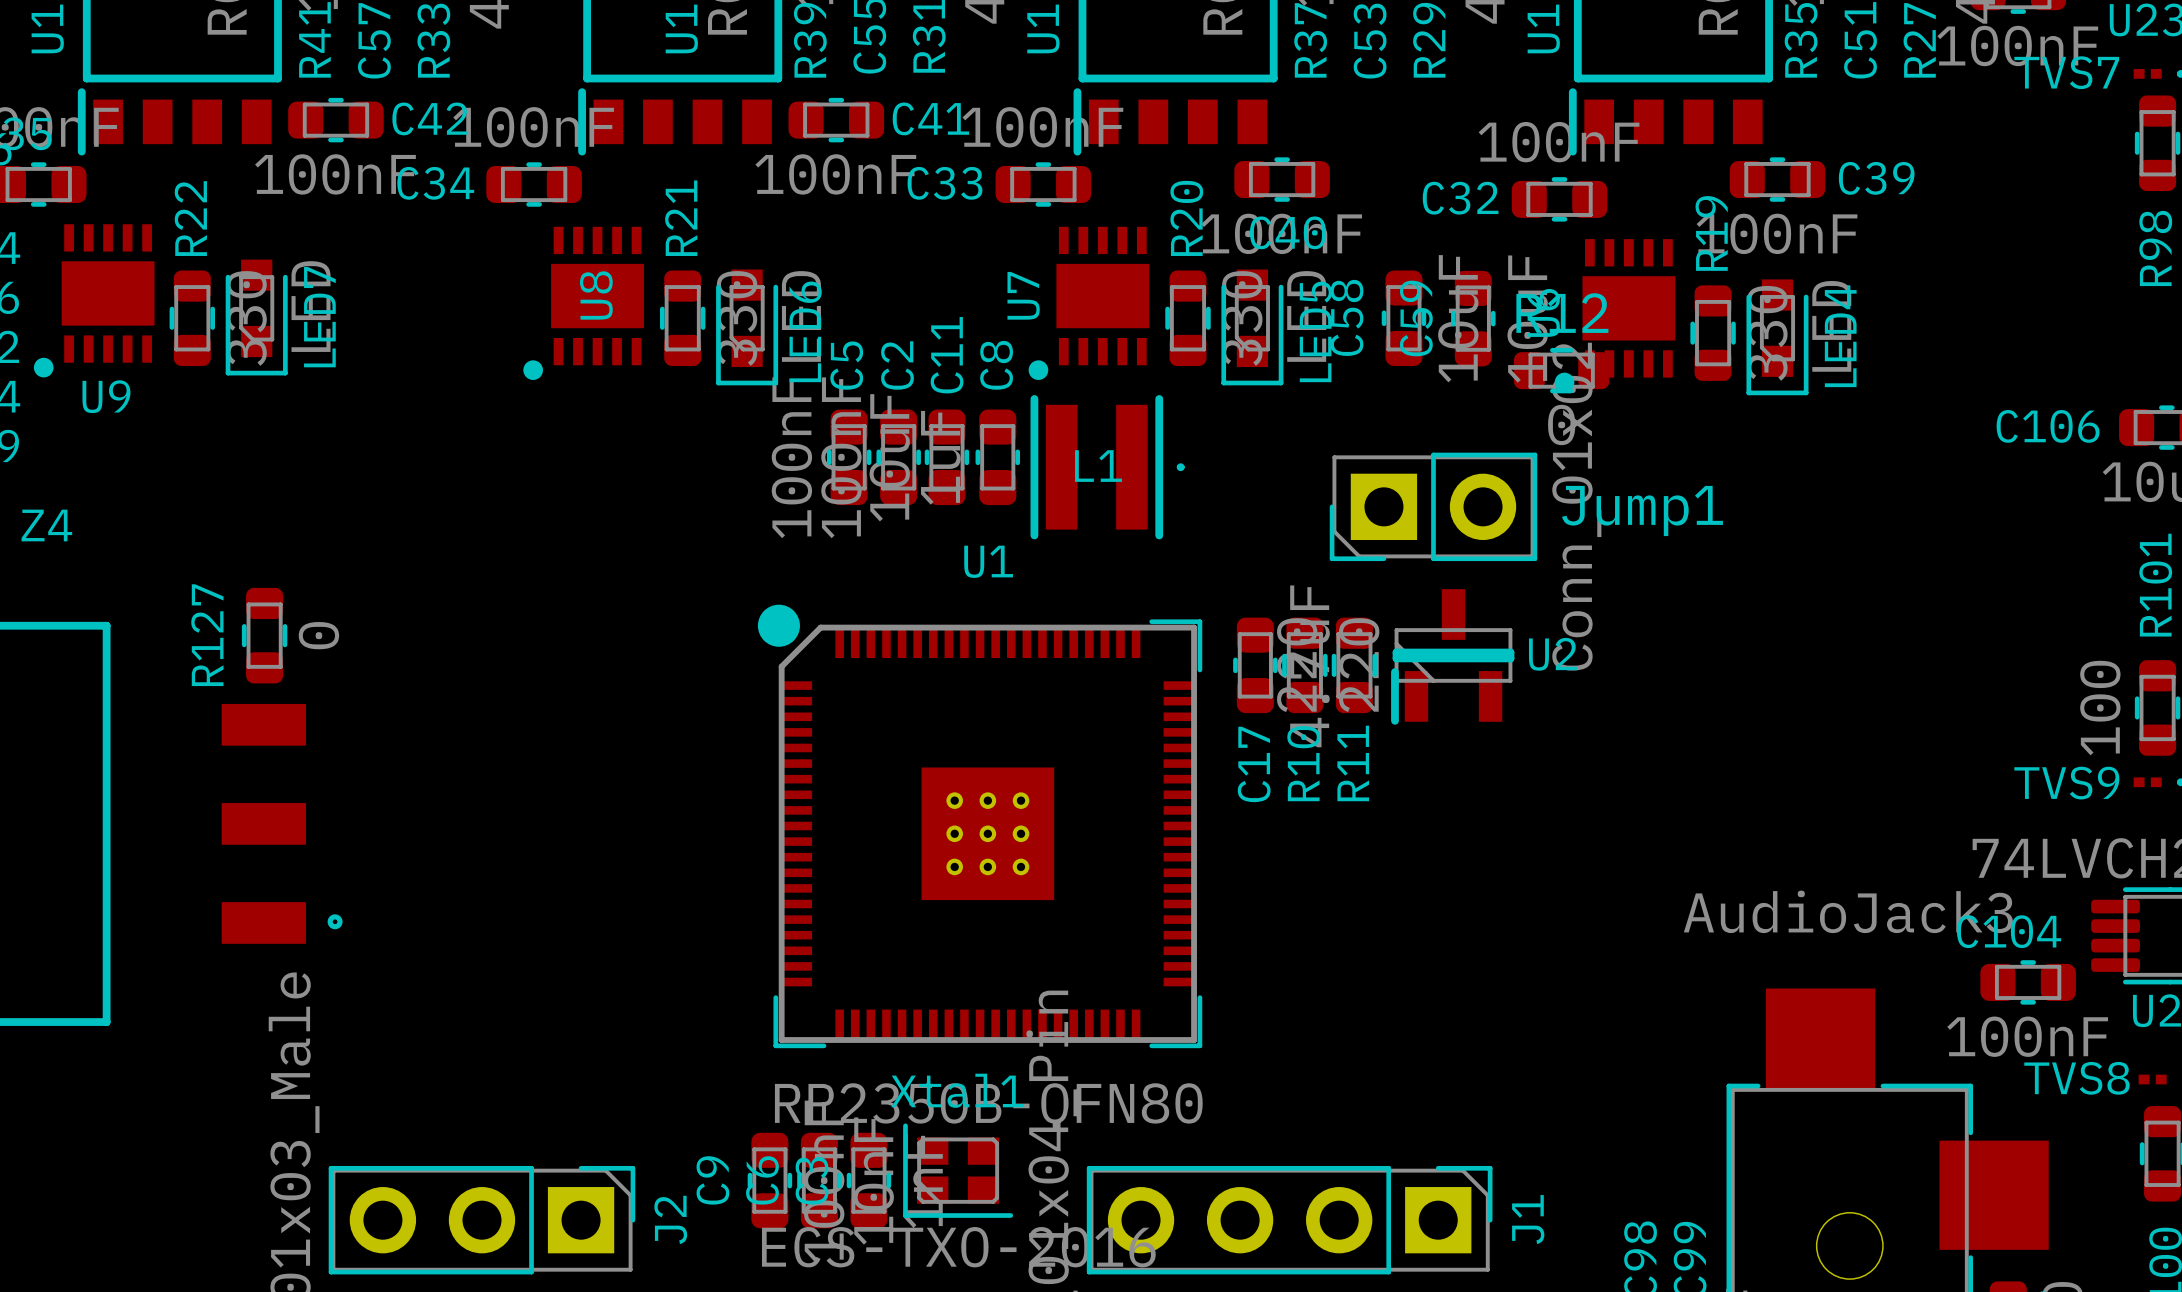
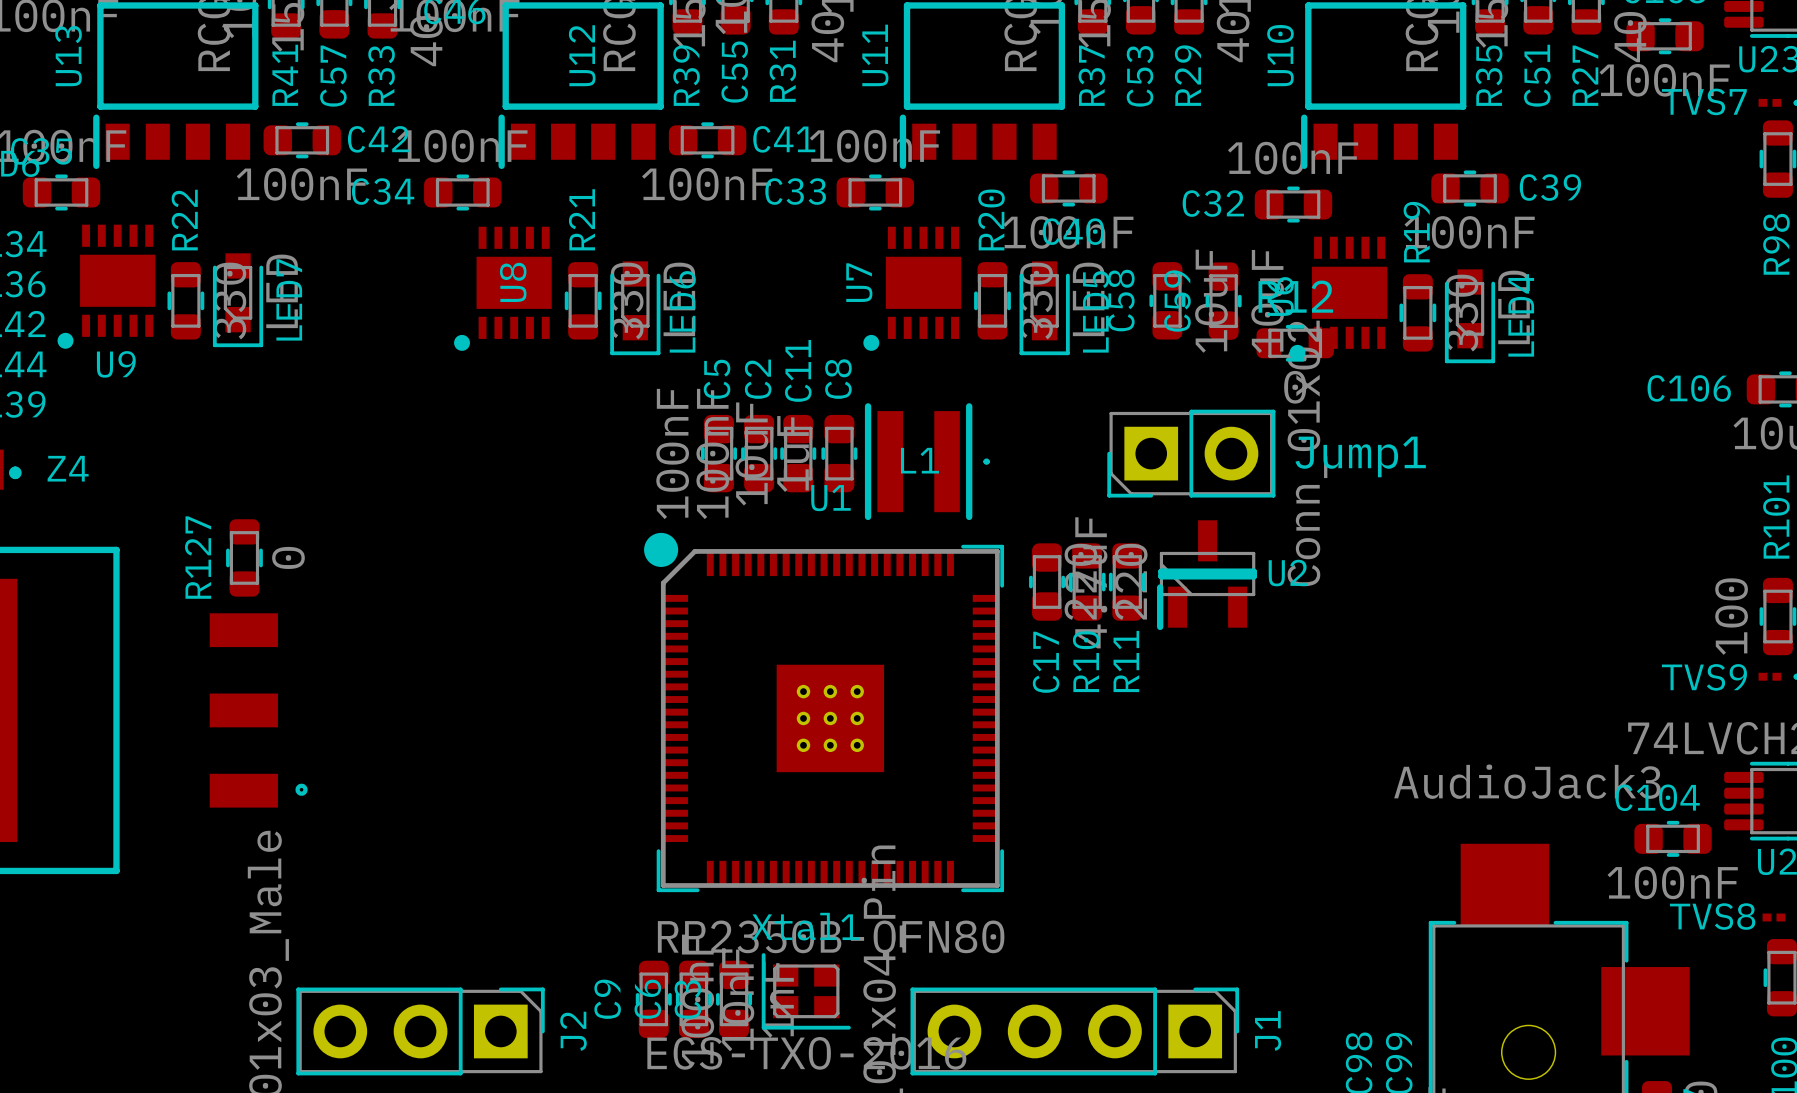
C5 position: (849, 457) -> (719, 453)
C2 position: (898, 457) -> (759, 453)
C11 position: (946, 457) -> (798, 453)
C8 position: (997, 457) -> (839, 453)
L1 position: (1107, 467) -> (927, 461)

